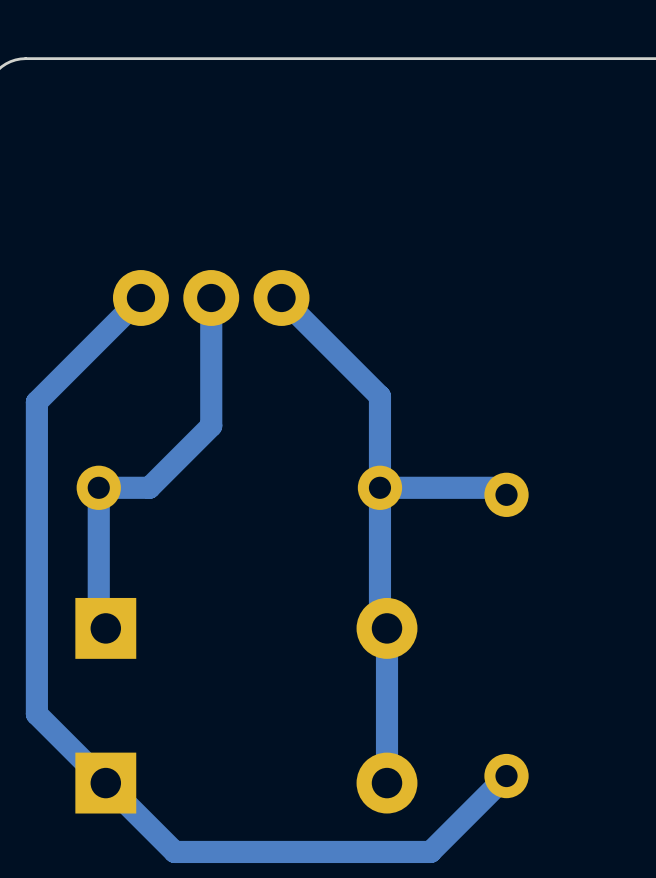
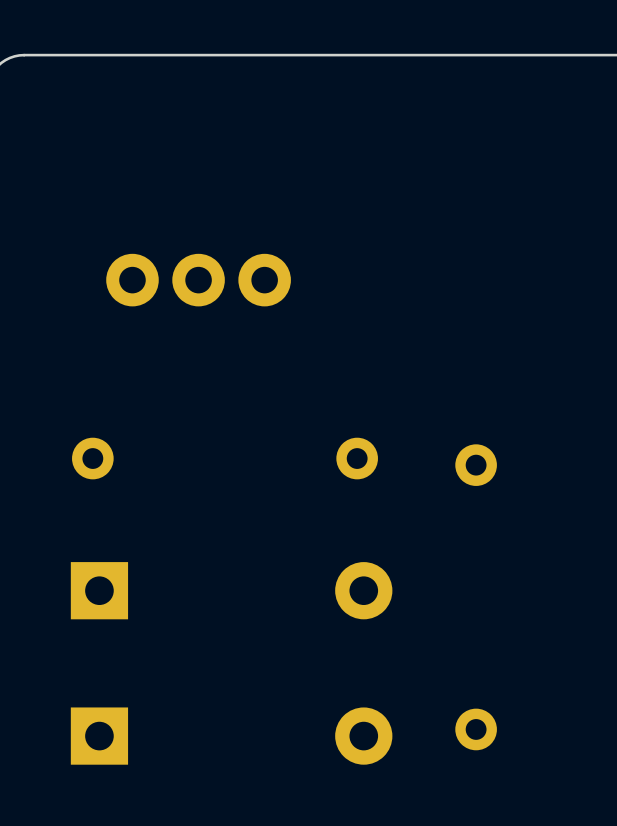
track: (140, 297) (36, 402) (36, 714) (174, 851) (430, 851) (506, 776) -> none
track: (211, 297) (211, 425) (149, 487) (98, 487) (98, 621) (105, 628) -> none
track: (281, 297) (379, 396) (379, 621) (387, 628) (387, 783) -> none
track: (379, 487) (499, 487) (506, 494) -> none

